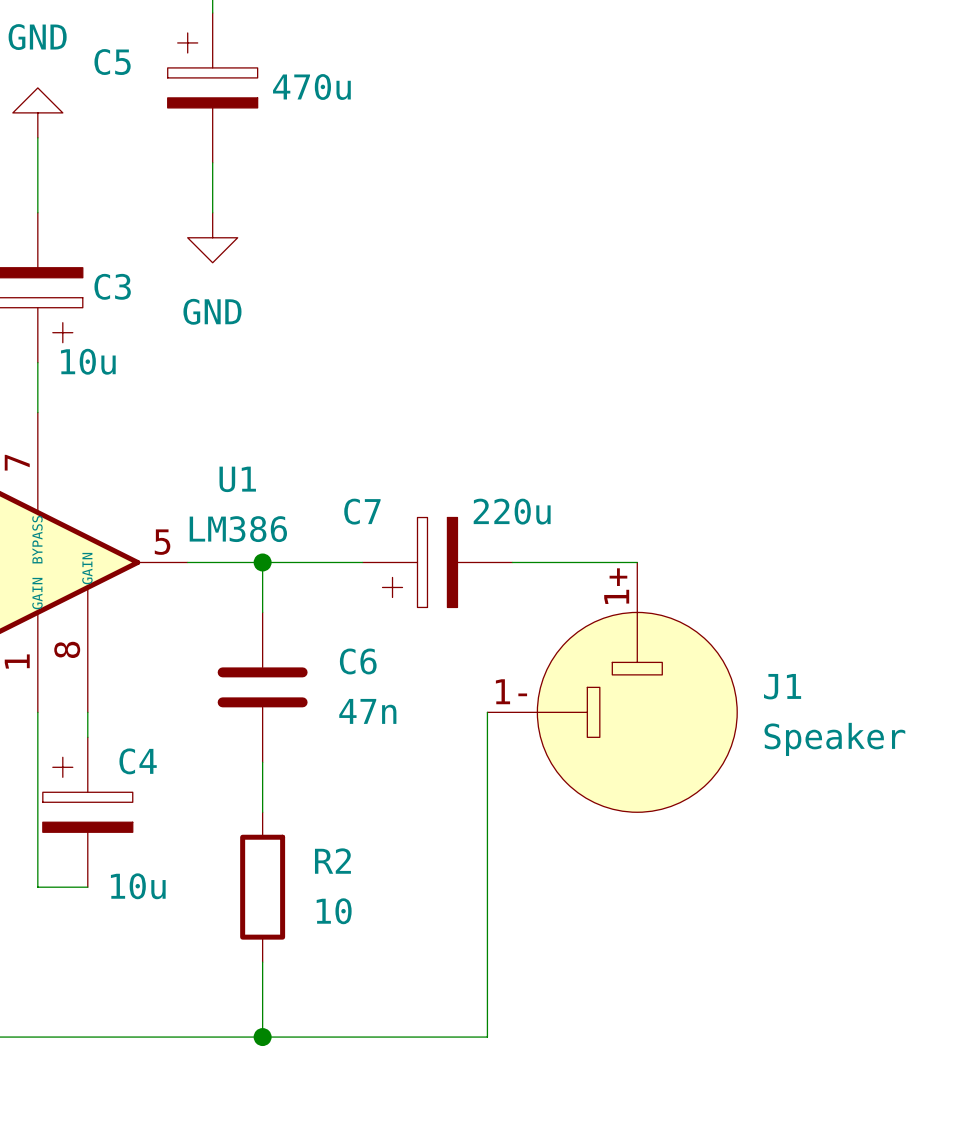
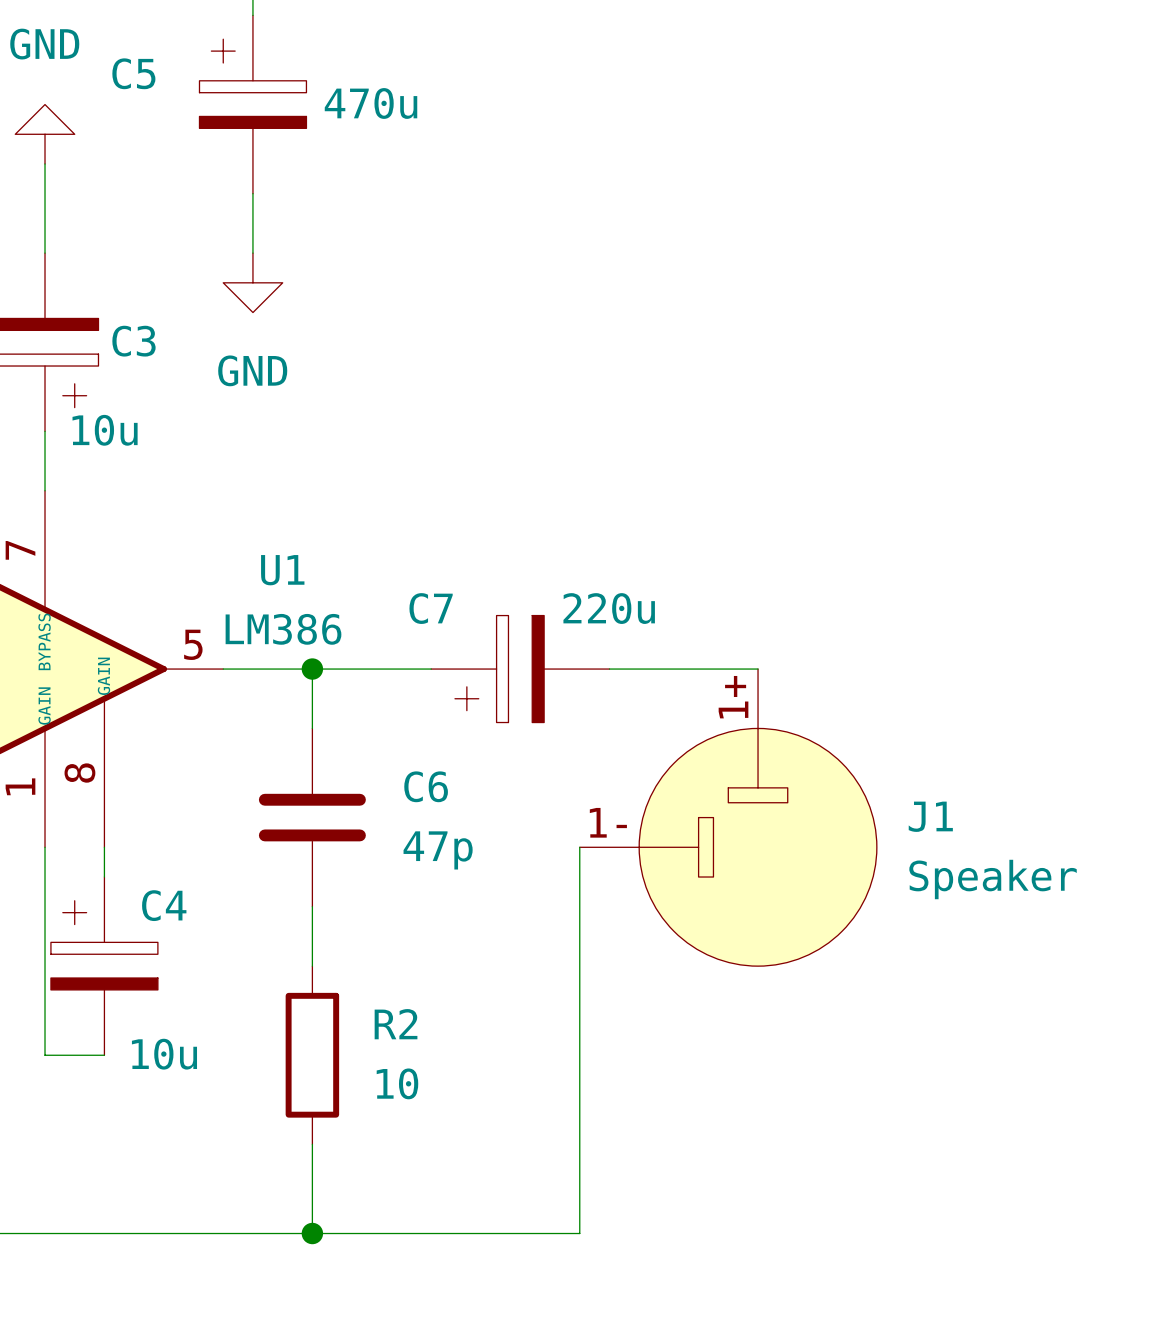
C6 value: 47n (367, 711) -> 47p (438, 850)

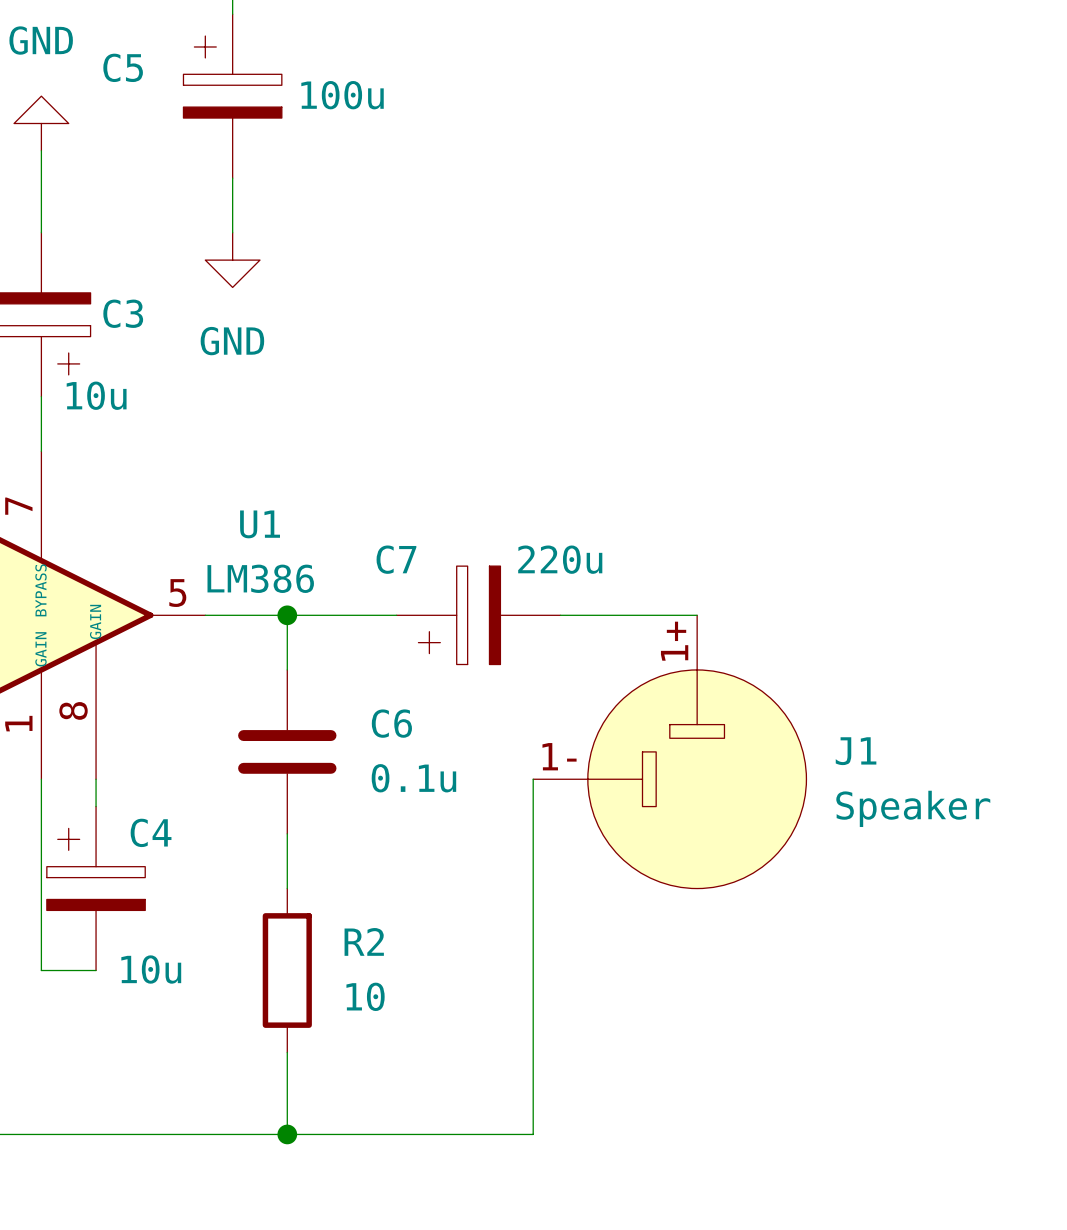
C5 value: 470u (371, 103) -> 100u (342, 95)
C6 value: 47p (438, 850) -> 0.1u (413, 778)

